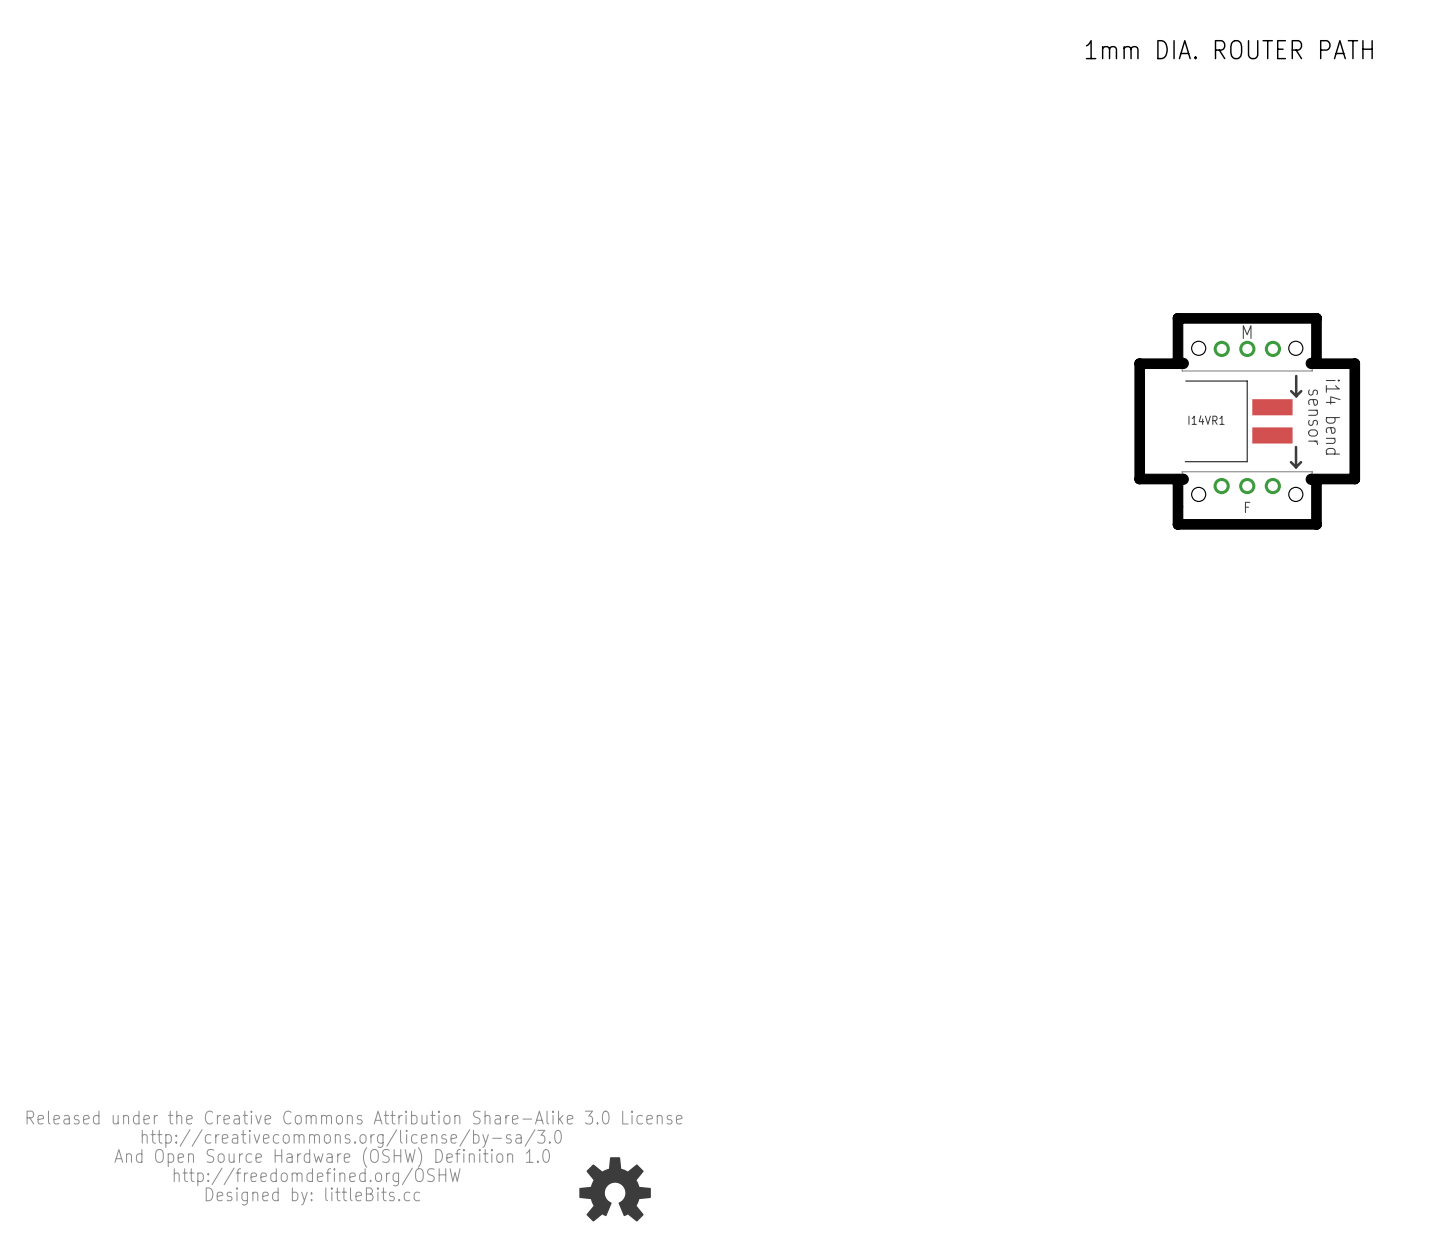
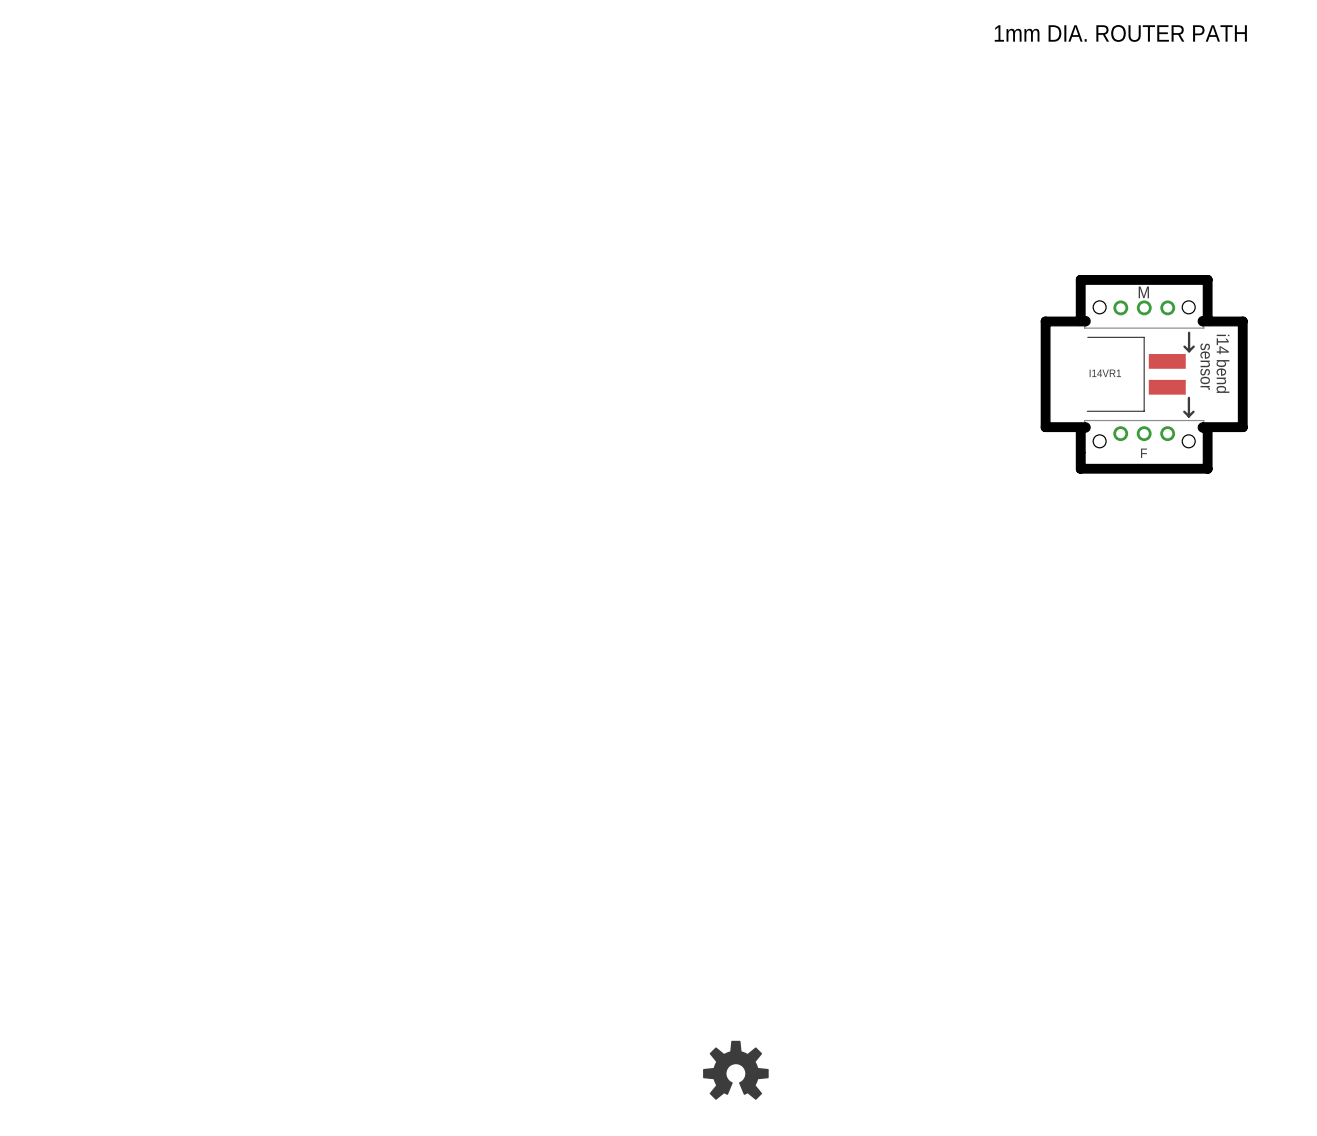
drawing: [26, 1110, 683, 1206] -> none
drawing position: (615, 1189) -> (735, 1070)

